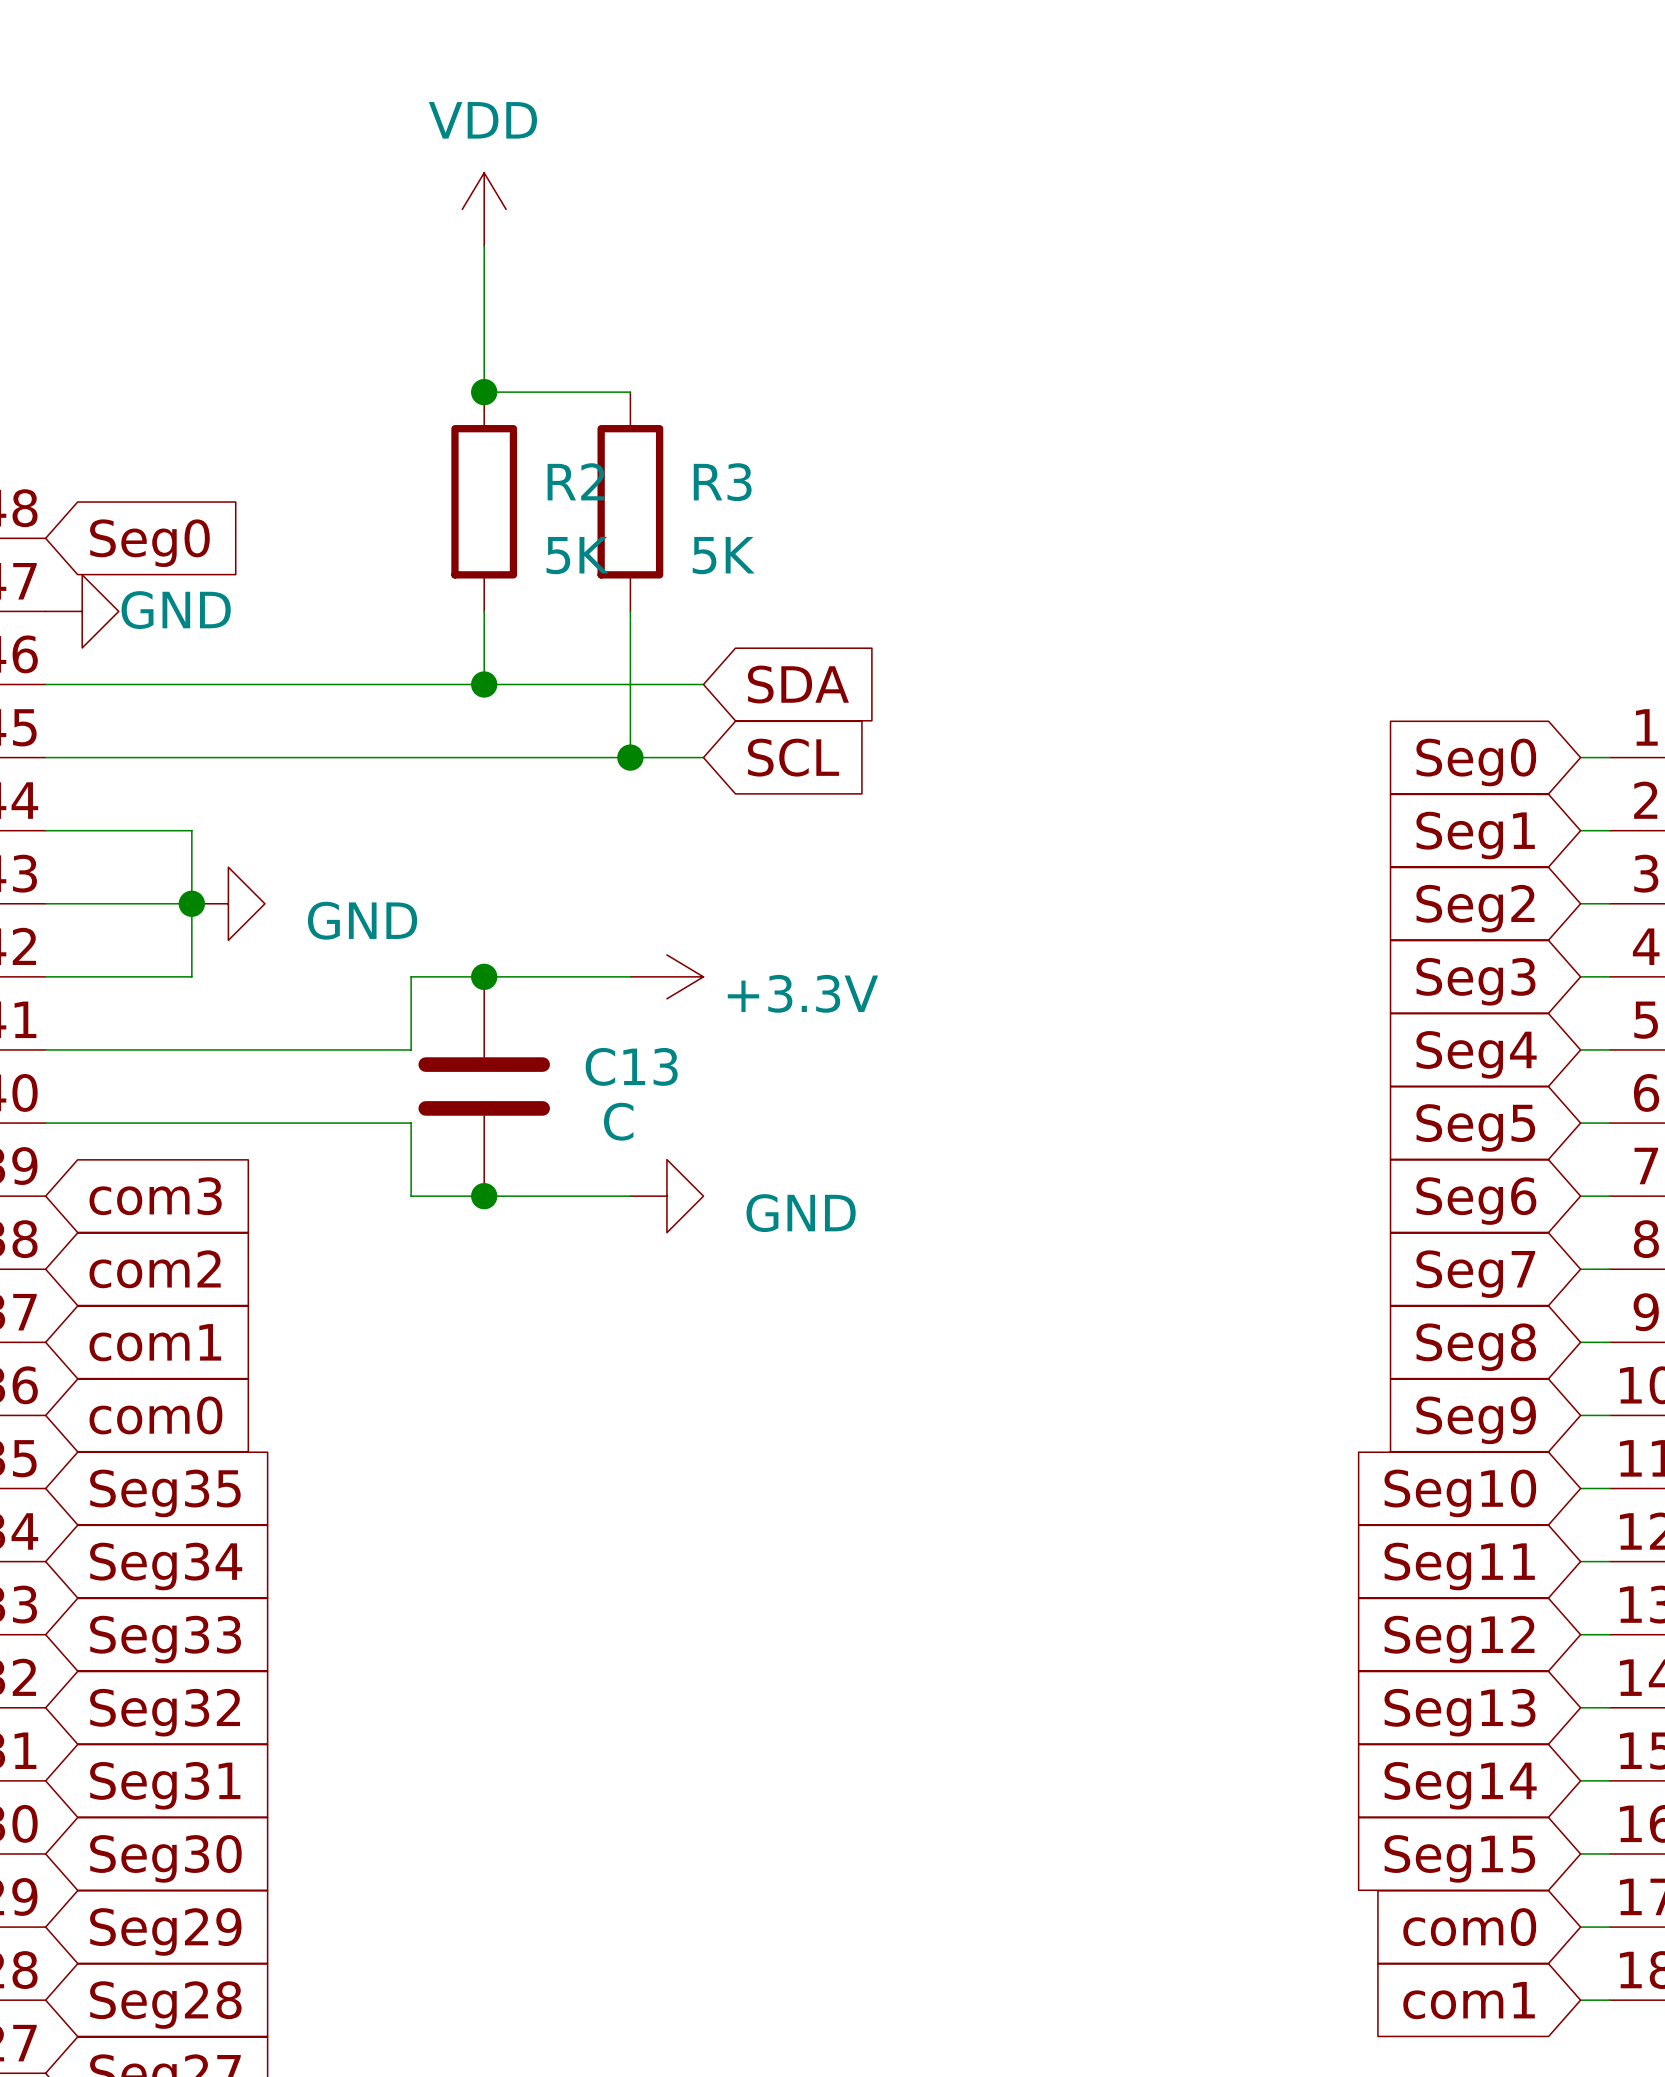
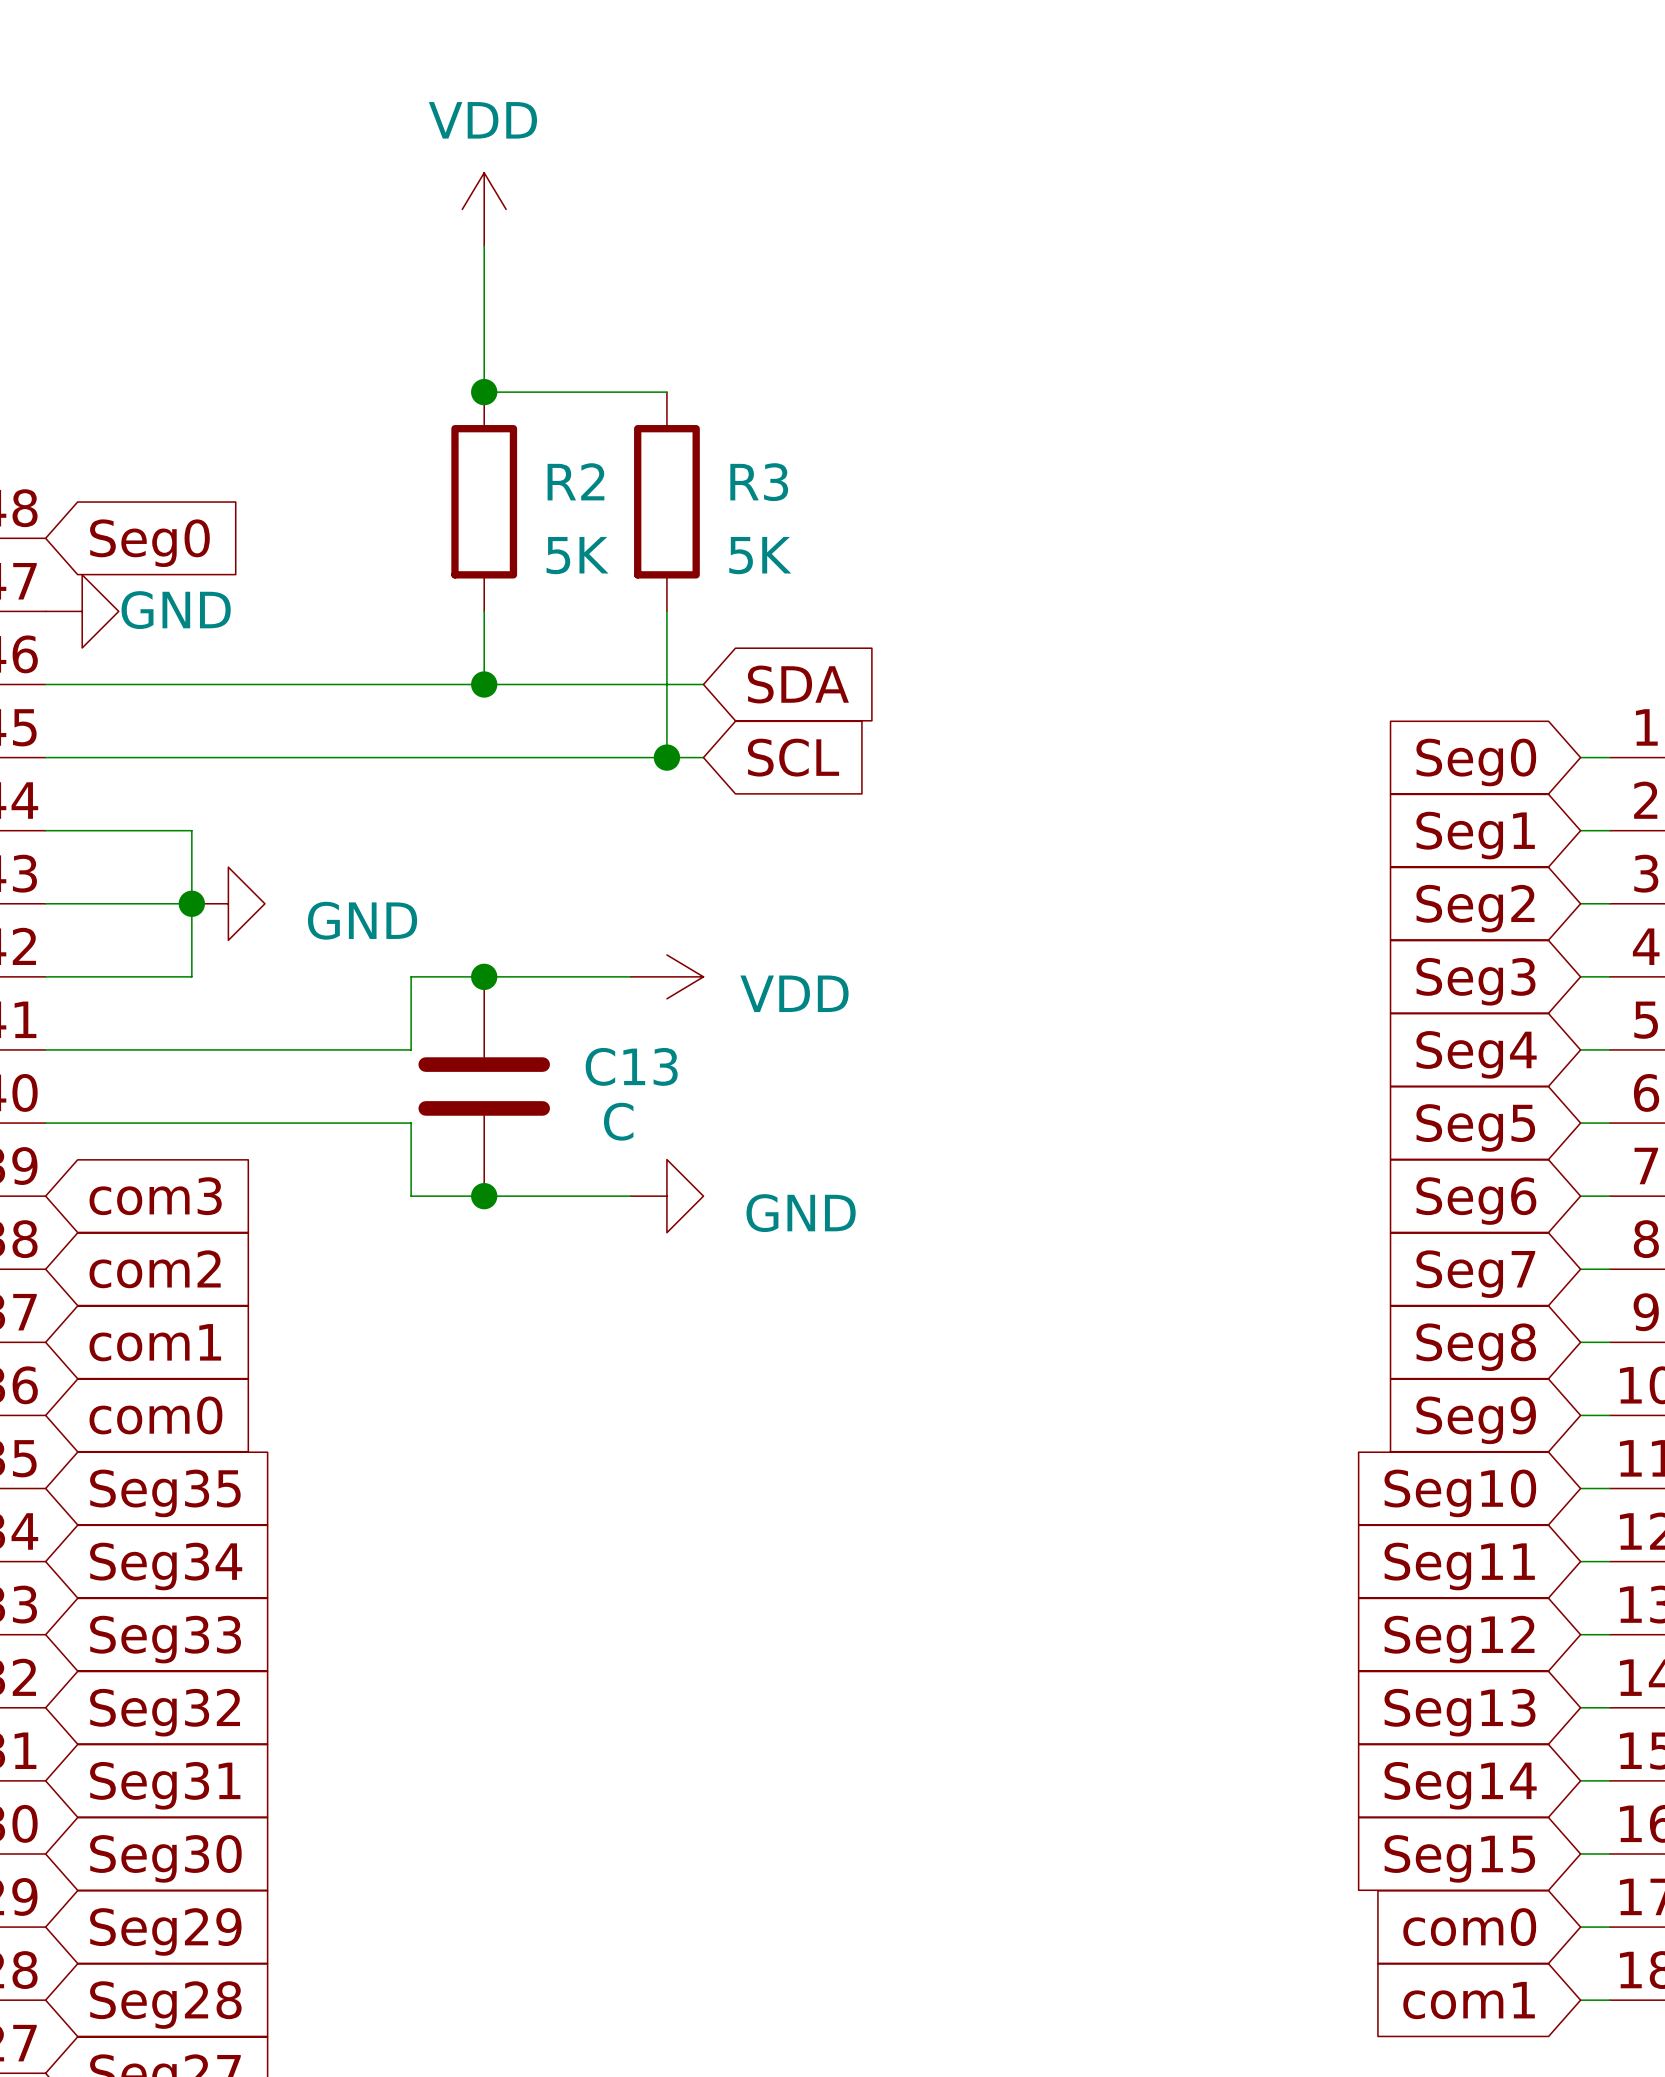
wire: none -> (630, 392) (666, 392)
R3 position: (630, 501) -> (666, 501)
wire: (630, 611) (630, 757) -> (666, 611) (666, 757)
junction position: (630, 757) -> (666, 757)
power symbol: +3.3V (666, 976) -> VDD (666, 976)

